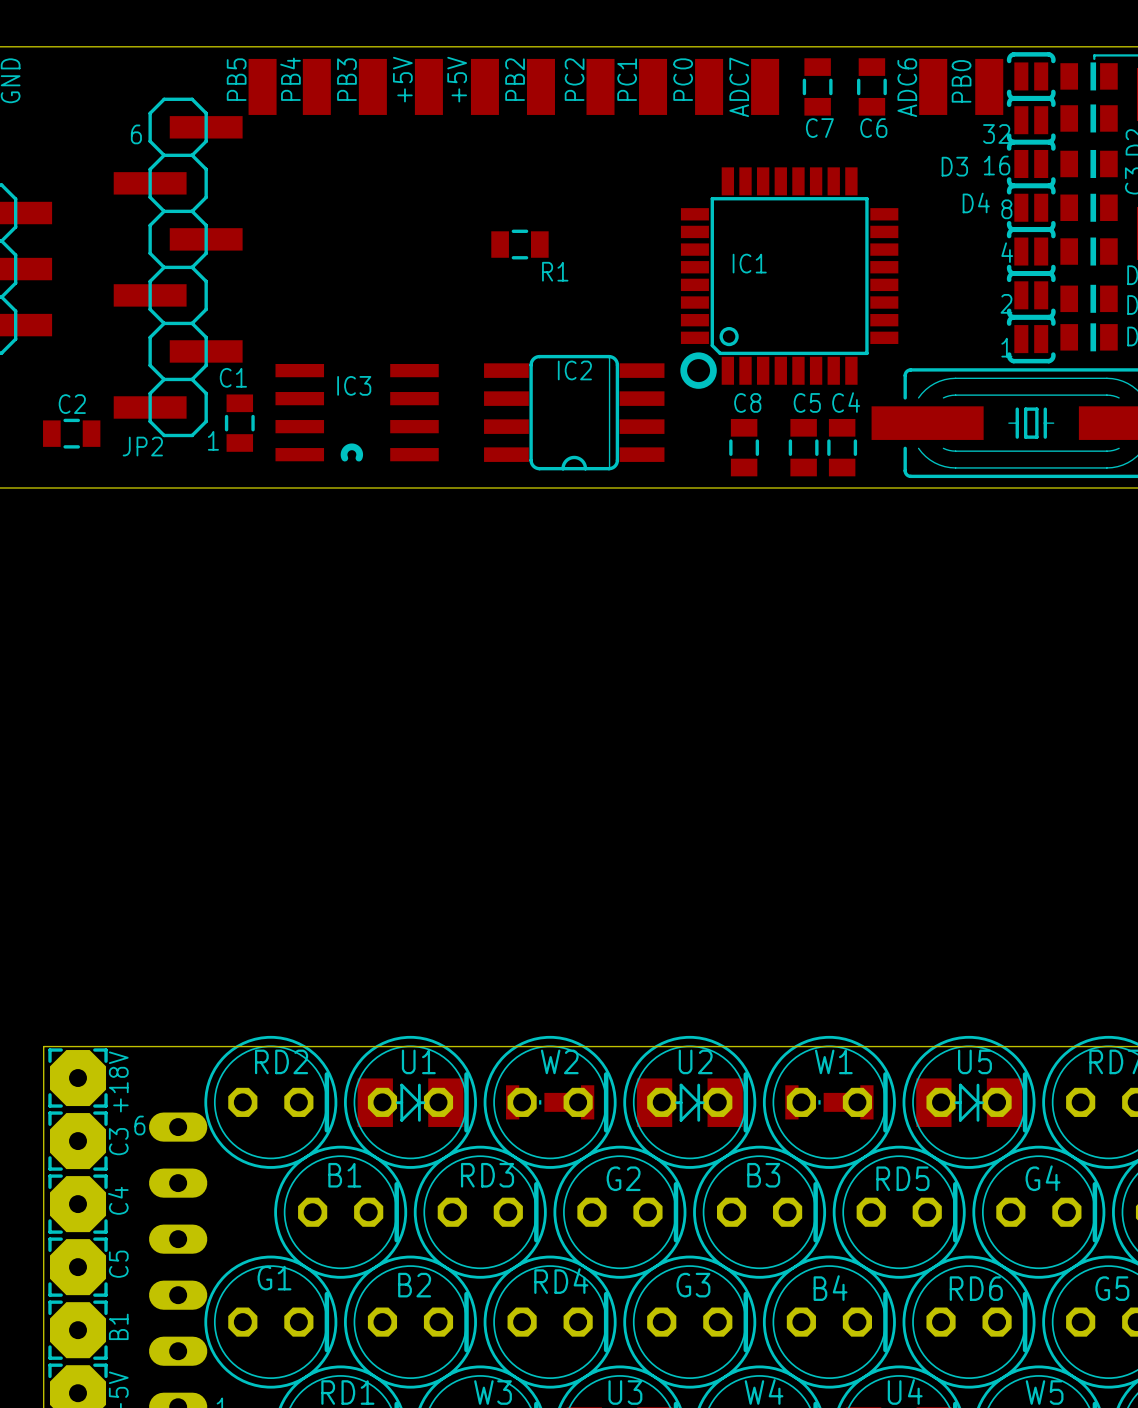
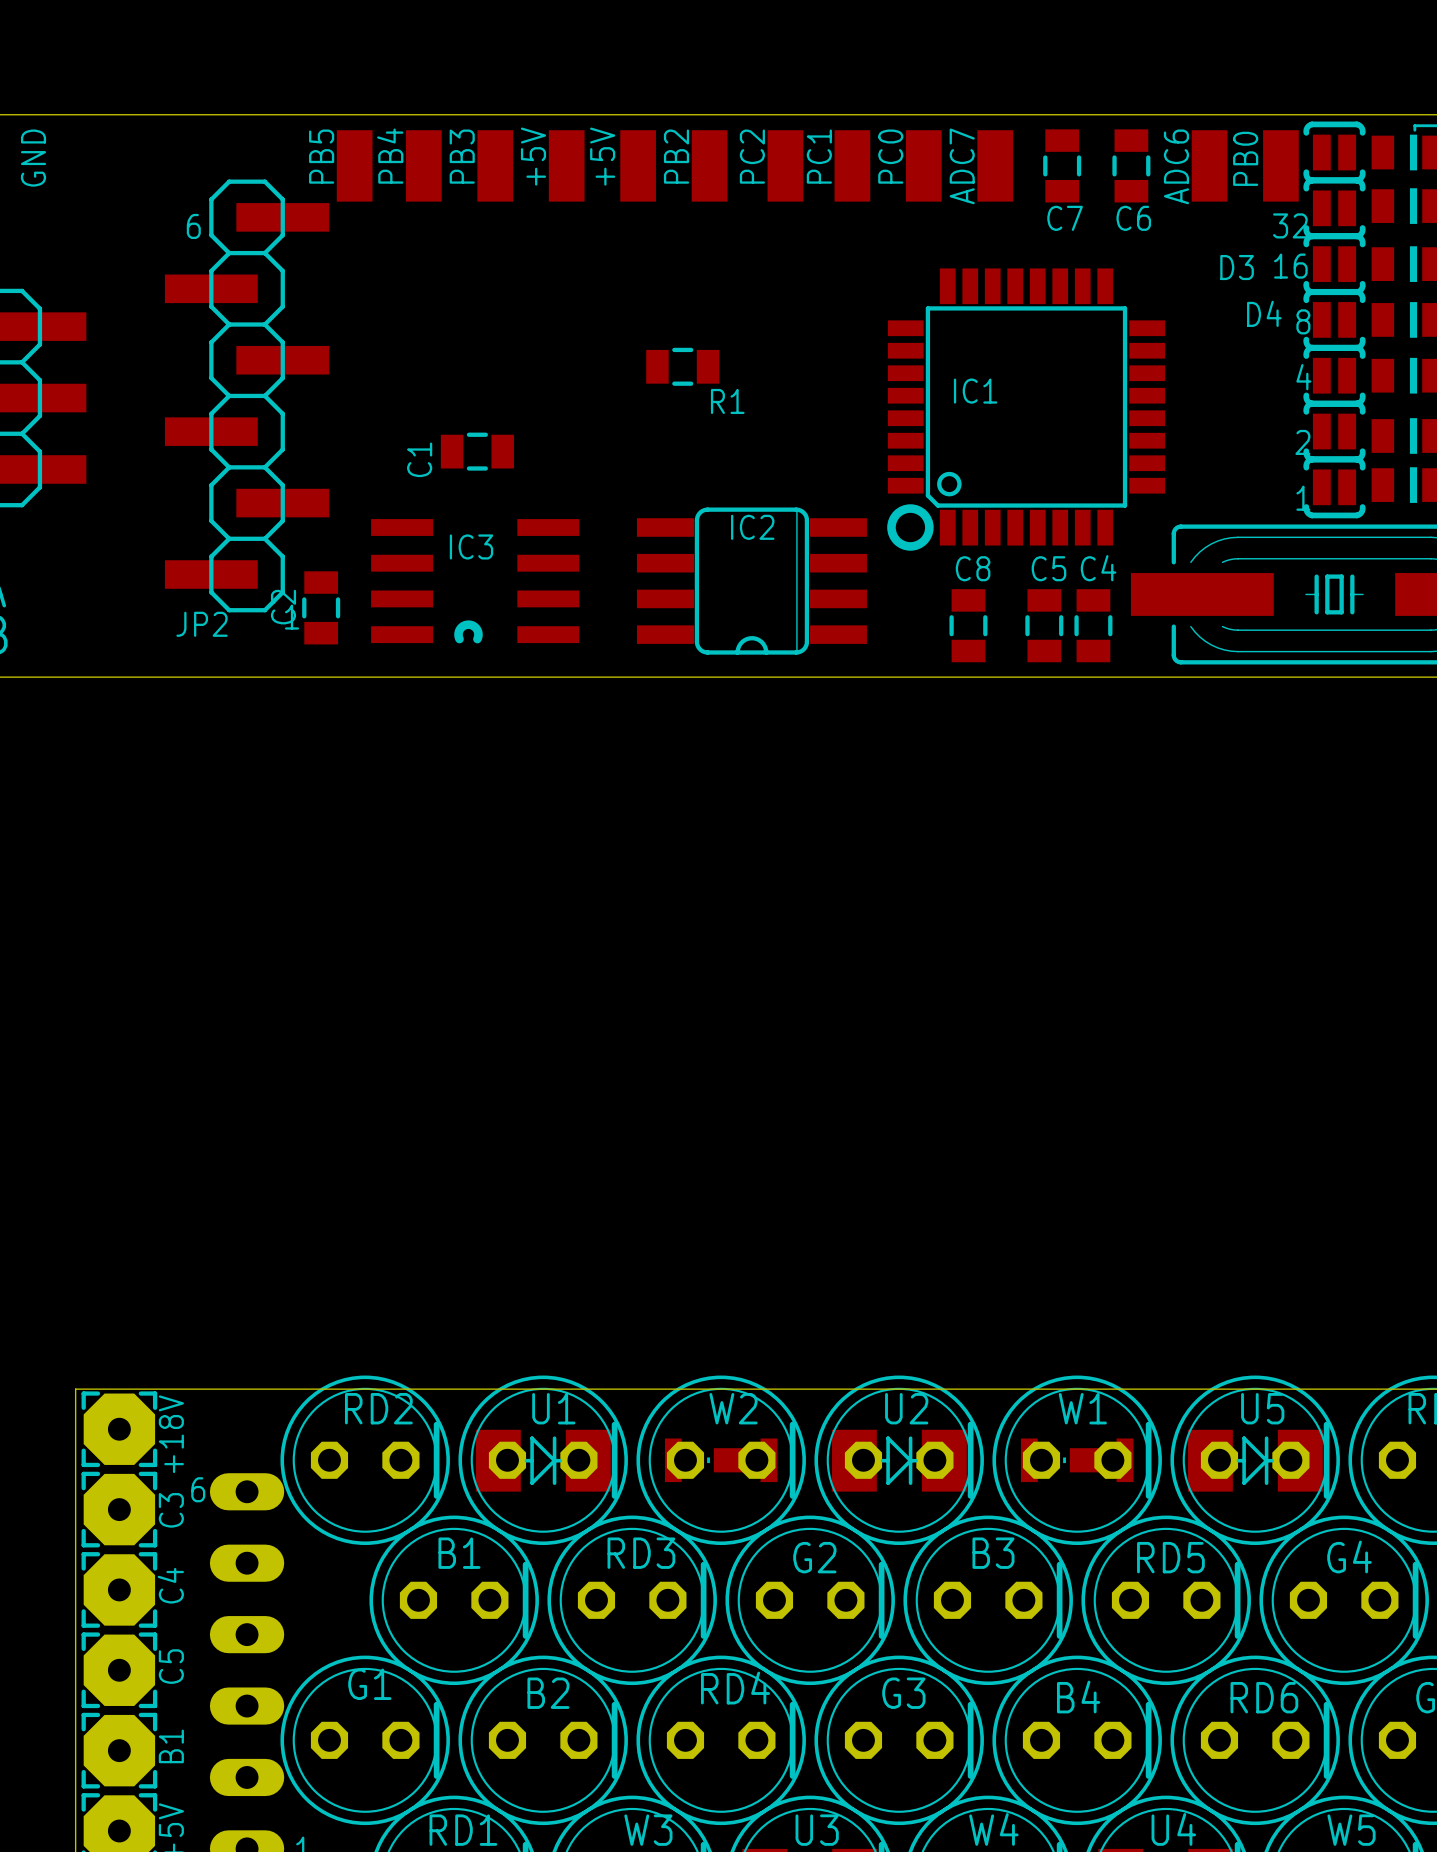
C1 name position: C1 (233, 377) -> C1 (419, 459)
C1 rotation: 0° (239, 423) -> 90° clockwise (477, 451)
C1 position: (239, 423) -> (477, 451)
C2 rotation: 0° (71, 433) -> 90° clockwise (321, 607)
C2 position: (71, 433) -> (321, 607)

